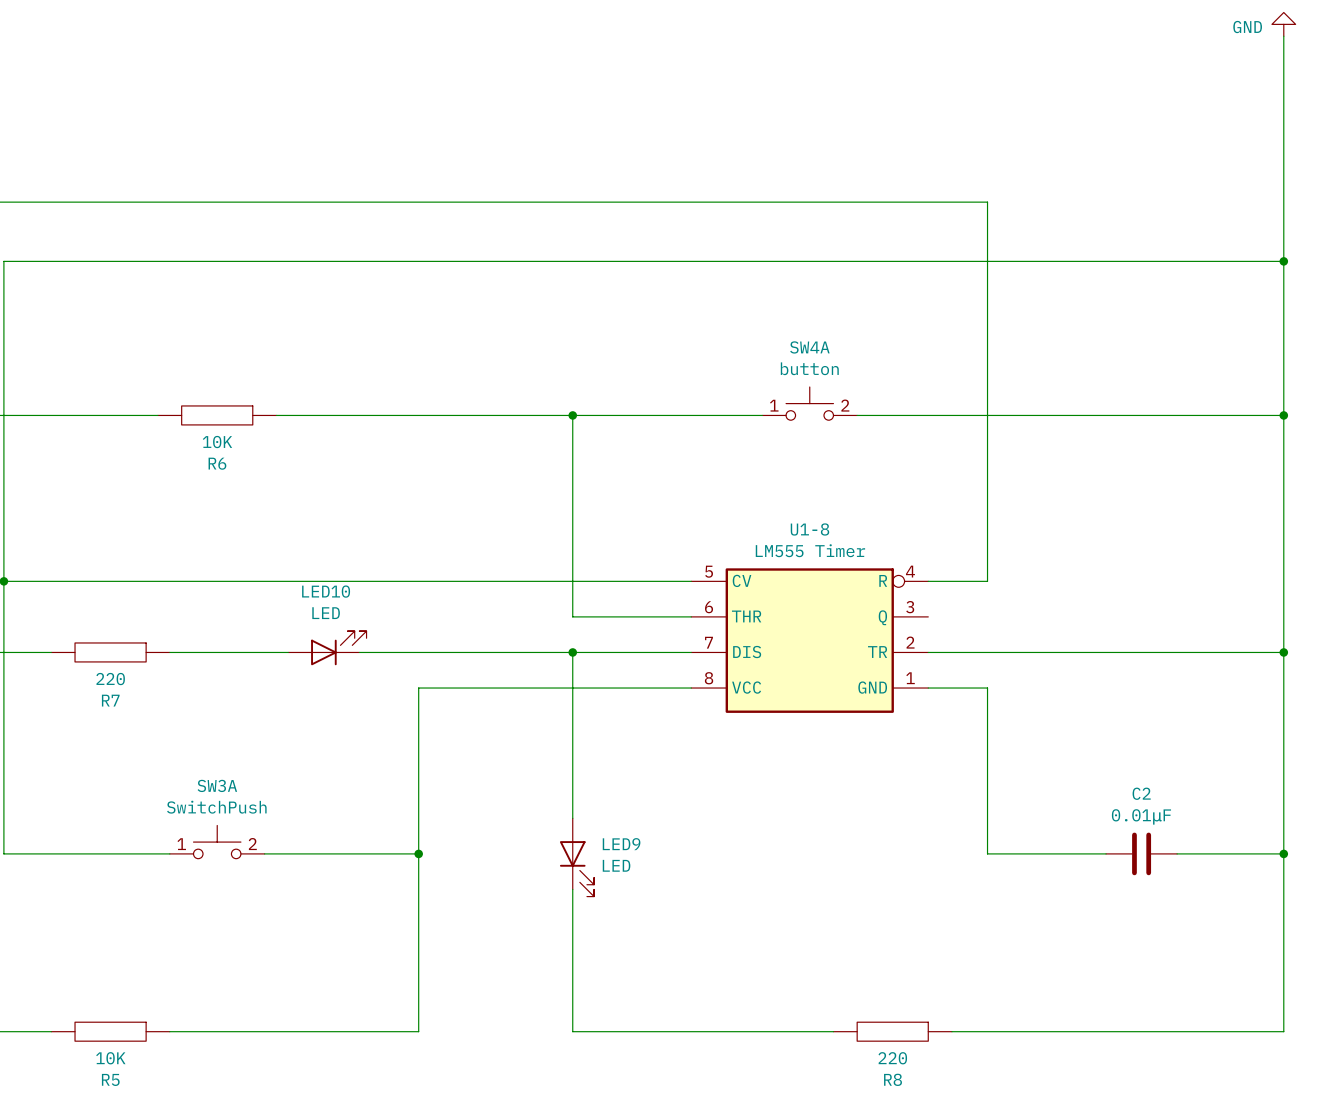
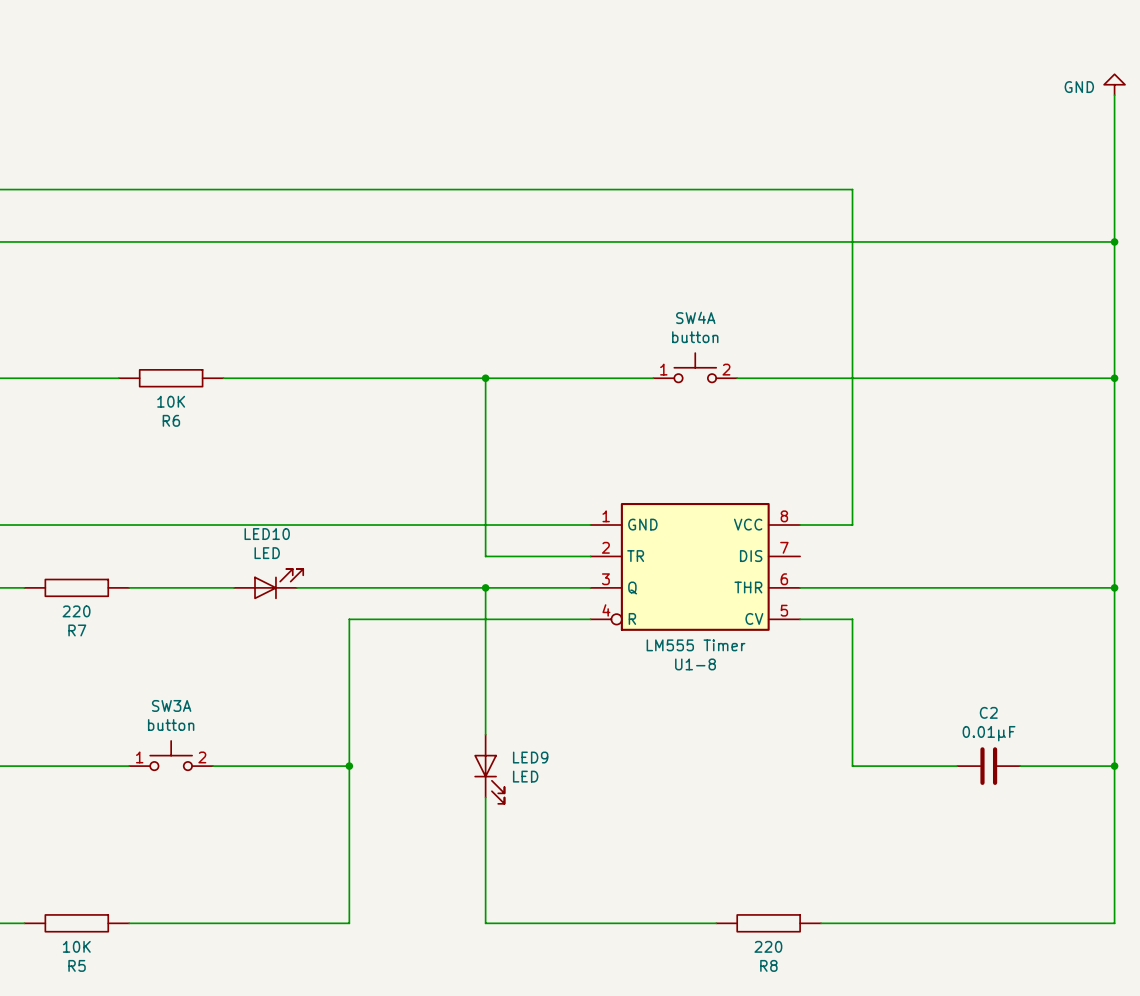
power symbol position: GND (1283, 24) -> GND (1114, 84)
wire: (1283, 36) (1283, 95) -> none
U1-8 rotation: 0° (809, 640) -> 180° (695, 566)
SW3A value: SwitchPush (216, 807) -> button (171, 725)

